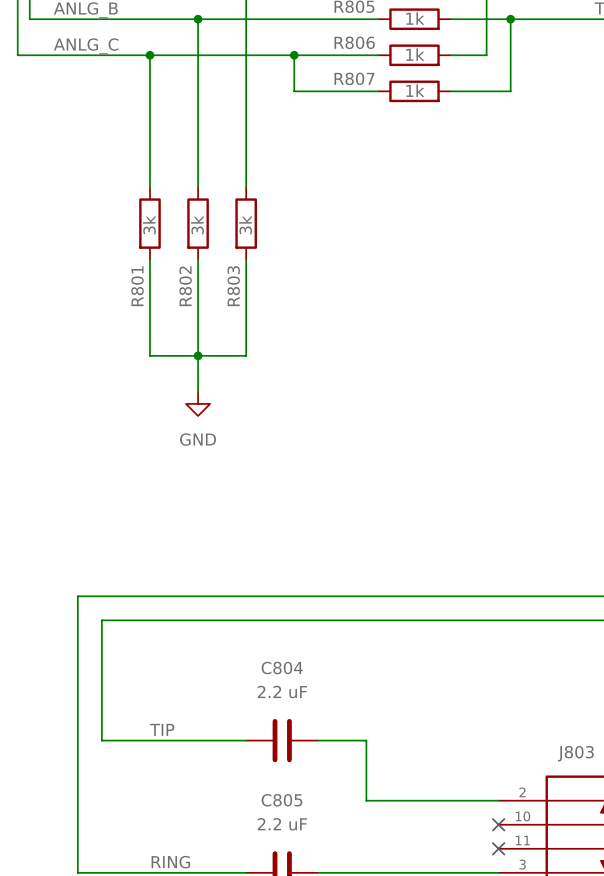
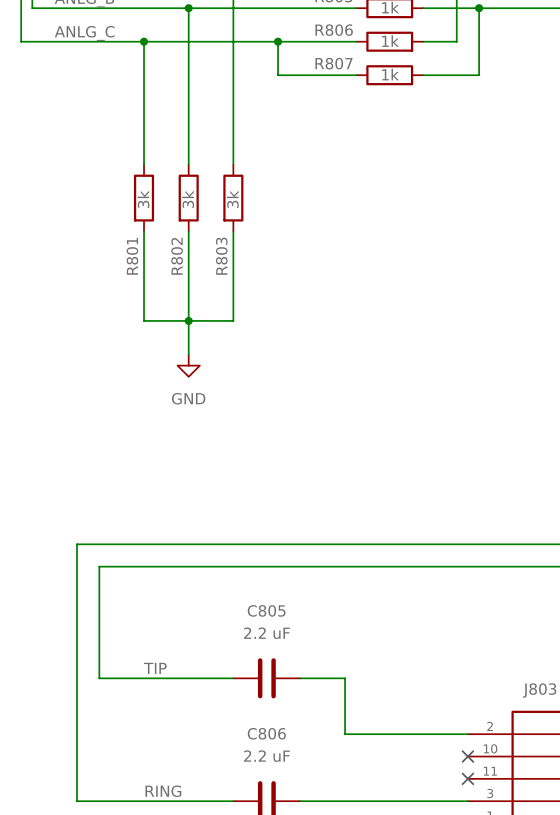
C804 name: C804 (282, 668) -> C805 (266, 610)
C805 name: C805 (281, 800) -> C806 (266, 733)

